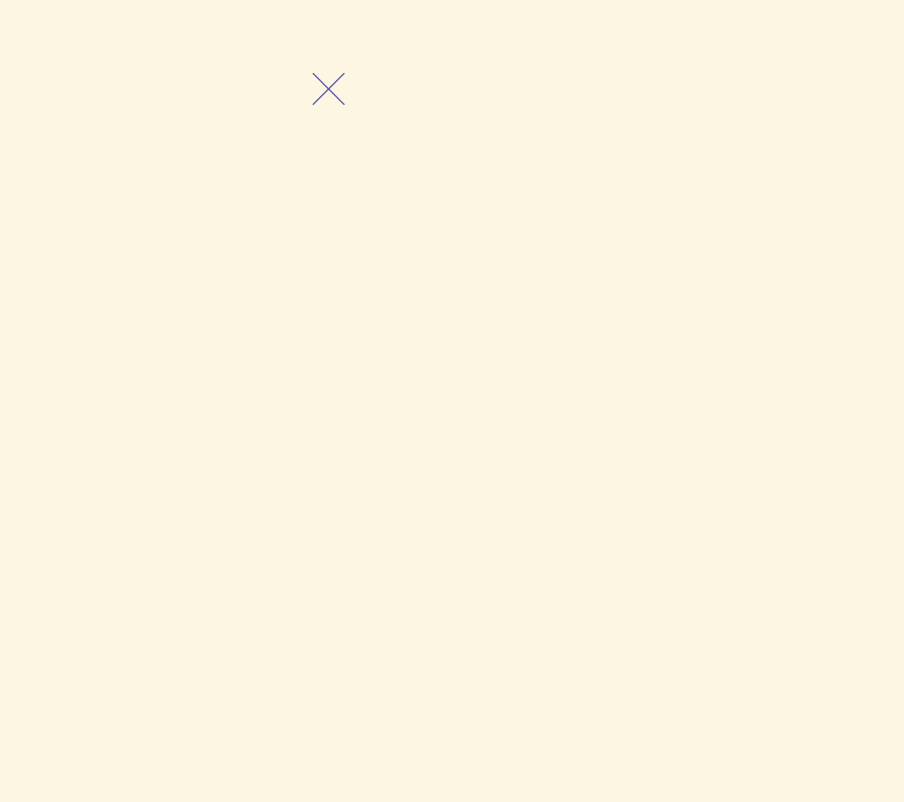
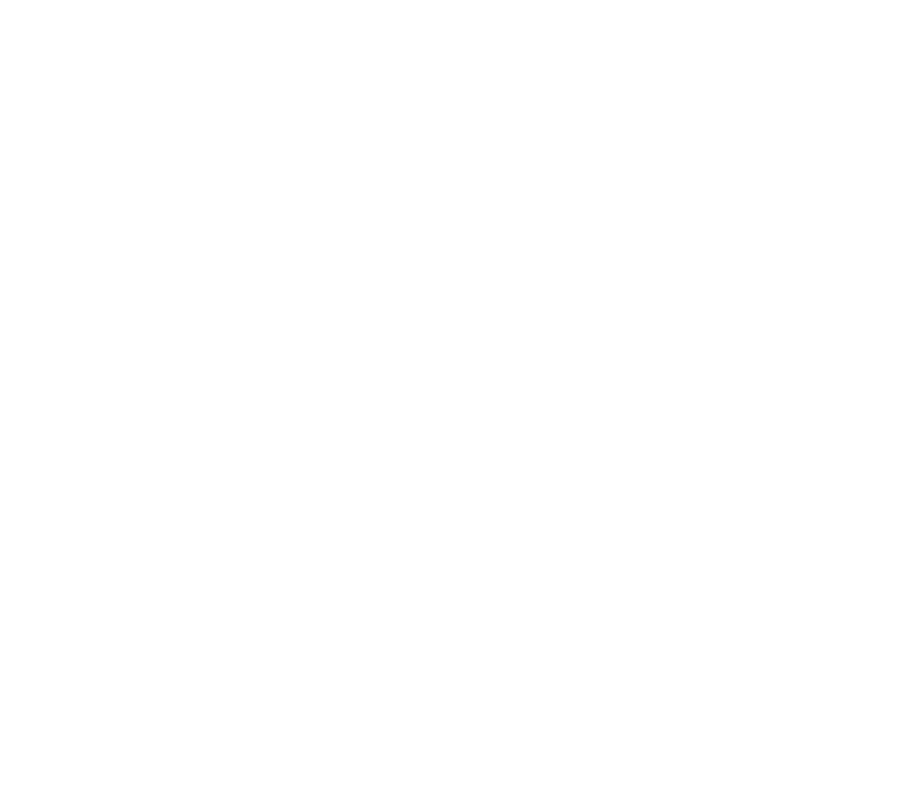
no-connect mark: (328, 88) -> none

